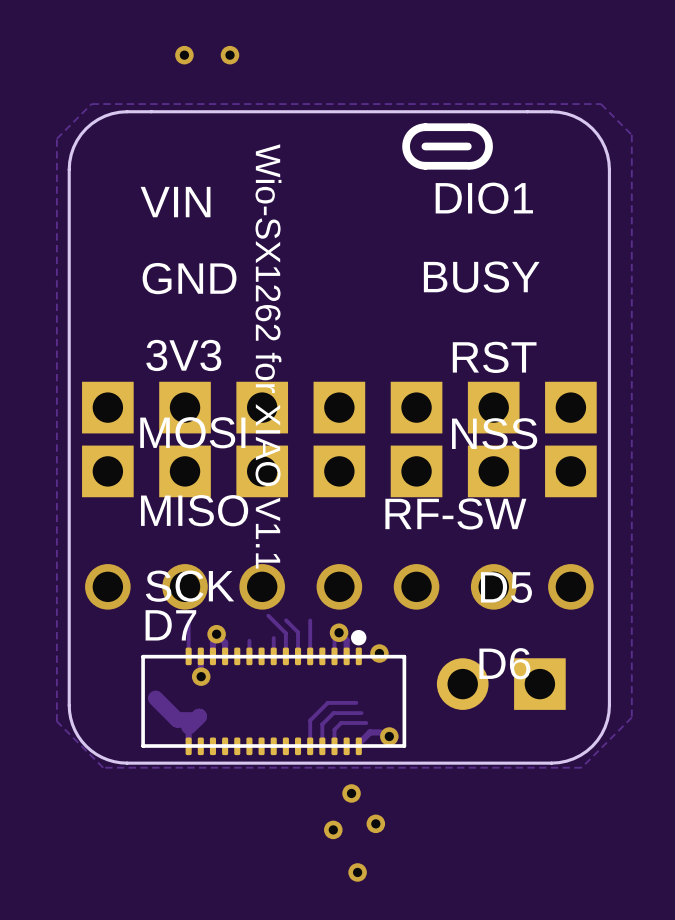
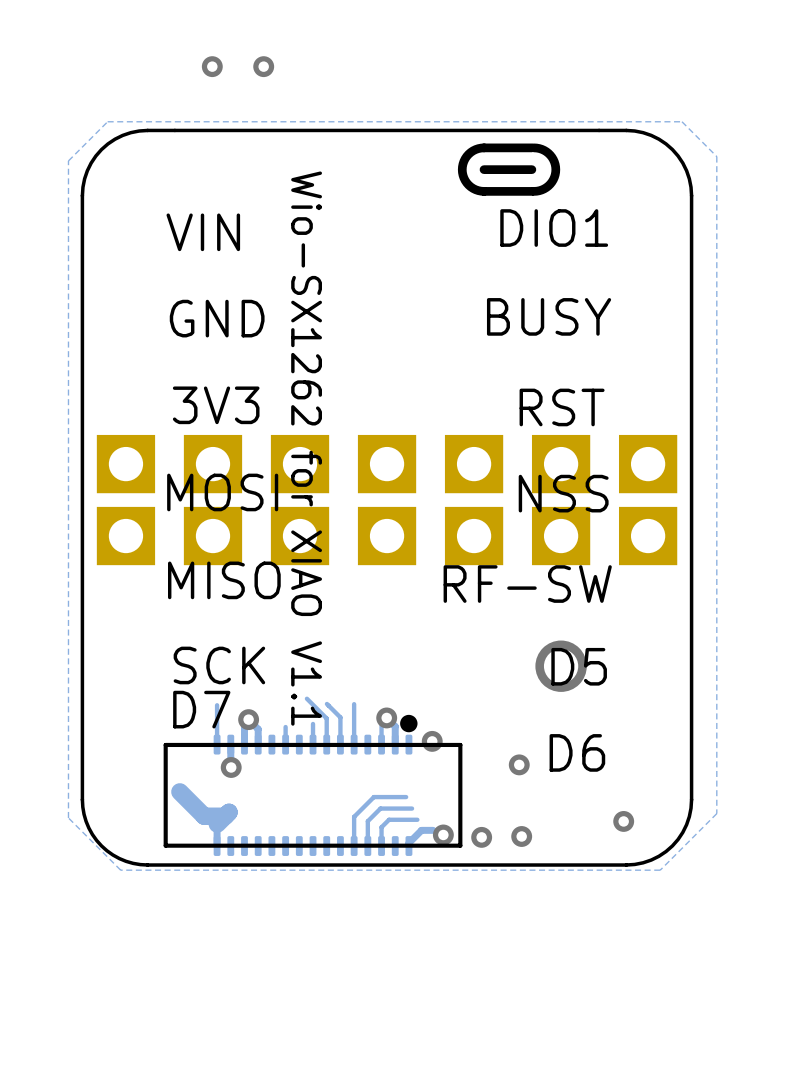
via: (107, 586) -> none
via: (185, 586) -> none
via: (262, 586) -> none
via: (339, 586) -> none
via: (416, 586) -> none
via: (570, 586) -> none
via: none -> (519, 764)
part: (501, 684) -> none
via: none -> (623, 821)
via: none -> (521, 836)
via: none -> (481, 837)
via: (351, 793) -> none
via: (375, 823) -> none
via: (333, 829) -> none
via: (357, 872) -> none

